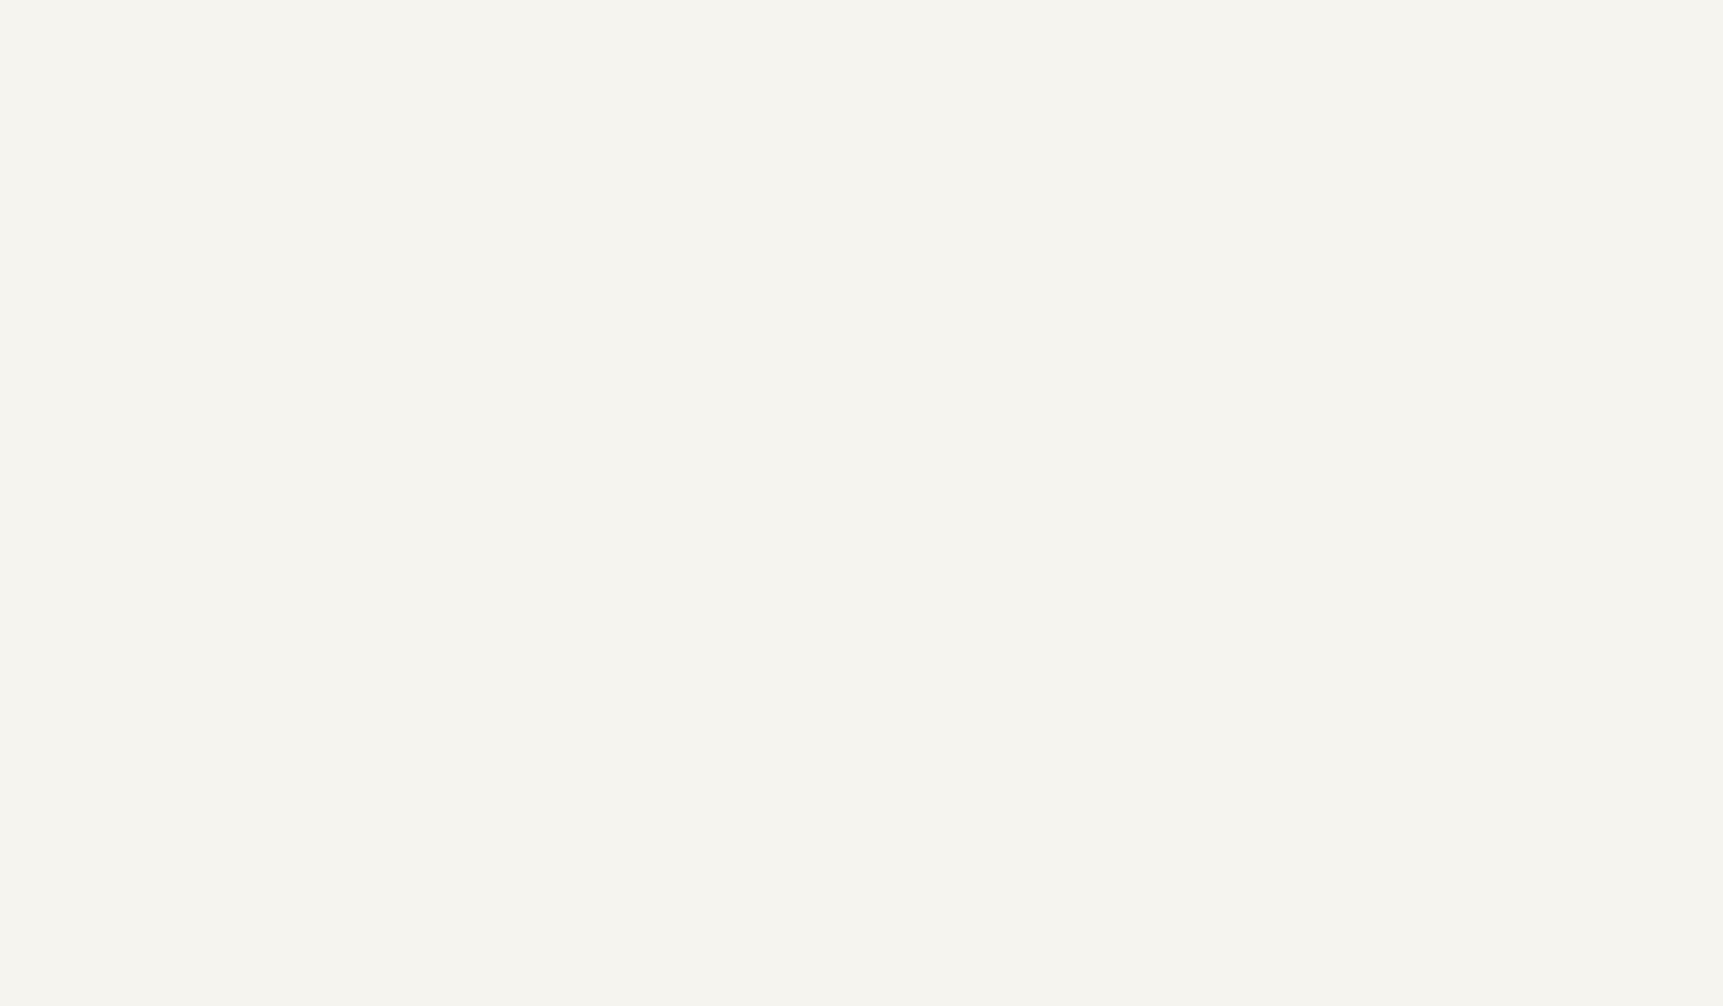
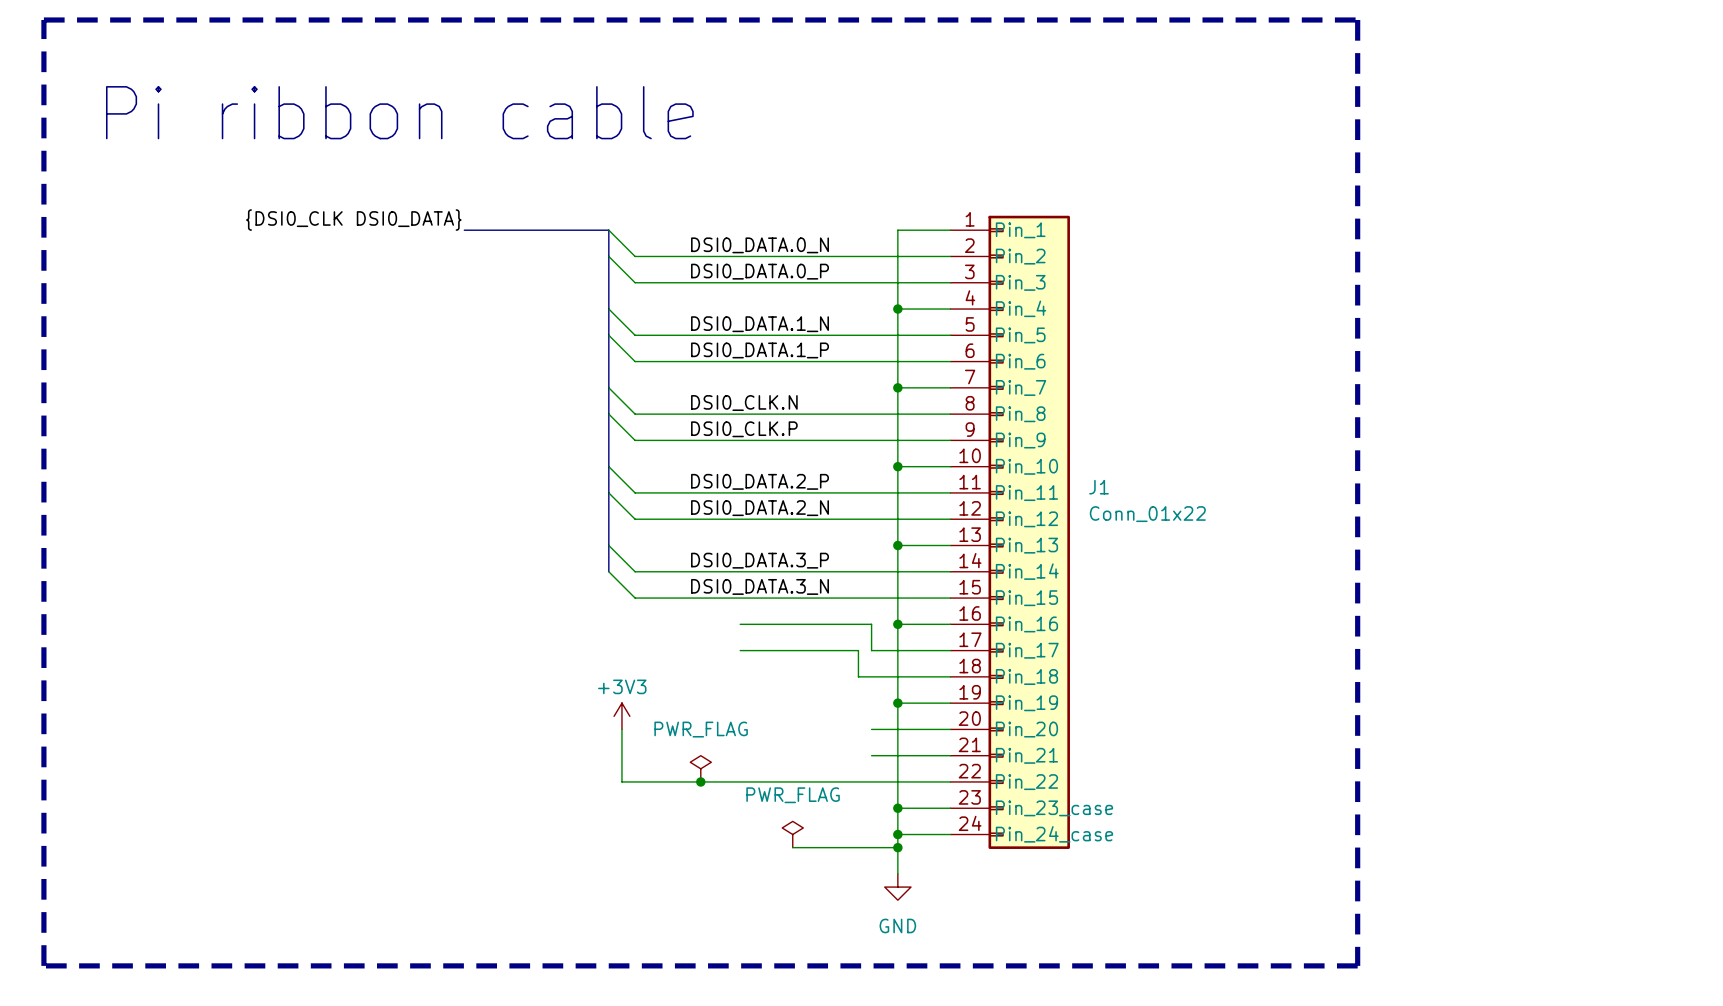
line: none -> (43, 20) (1357, 20) (1357, 965) (43, 965) (43, 20)
text: none -> Pi ribbon cable (399, 112)
label: none -> {DSI0_CLK DSI0_DATA} (353, 220)
bus: none -> (464, 230) (608, 230) (608, 571)
wire: none -> (608, 230) (635, 256) (950, 256)
wire: none -> (950, 230) (897, 230) (897, 873)
label: none -> DSI0_DATA.0_N (760, 245)
wire: none -> (608, 256) (635, 282) (950, 282)
label: none -> DSI0_DATA.0_P (760, 271)
wire: none -> (608, 309) (635, 335) (950, 335)
wire: none -> (897, 309) (950, 309)
junction: none -> (897, 309)
label: none -> DSI0_DATA.1_N (760, 324)
wire: none -> (608, 335) (635, 361) (950, 361)
label: none -> DSI0_DATA.1_P (760, 350)
wire: none -> (608, 387) (635, 414) (950, 414)
wire: none -> (897, 387) (950, 387)
junction: none -> (897, 387)
label: none -> DSI0_CLK.N (744, 403)
wire: none -> (608, 414) (635, 440) (950, 440)
label: none -> DSI0_CLK.P (744, 429)
wire: none -> (608, 466) (635, 492) (950, 492)
wire: none -> (897, 466) (950, 466)
junction: none -> (897, 466)
label: none -> DSI0_DATA.2_P (760, 481)
wire: none -> (608, 492) (635, 519) (950, 519)
label: none -> DSI0_DATA.2_N (760, 508)
J1: none -> Conn_01x22 (1010, 532)
wire: none -> (608, 545) (635, 571) (950, 571)
wire: none -> (897, 545) (950, 545)
junction: none -> (897, 545)
label: none -> DSI0_DATA.3_P (760, 560)
wire: none -> (608, 571) (635, 598) (950, 598)
label: none -> DSI0_DATA.3_N (760, 586)
wire: none -> (740, 624) (871, 624) (871, 650) (950, 650)
wire: none -> (897, 624) (950, 624)
junction: none -> (897, 624)
wire: none -> (740, 650) (858, 650) (858, 676) (950, 676)
wire: none -> (897, 703) (950, 703)
junction: none -> (897, 703)
power symbol: none -> +3V3 (621, 716)
wire: none -> (621, 729) (621, 781) (950, 781)
wire: none -> (871, 729) (950, 729)
wire: none -> (871, 755) (950, 755)
power symbol: none -> PWR_FLAG (700, 768)
junction: none -> (700, 781)
wire: none -> (897, 808) (950, 808)
junction: none -> (897, 808)
power symbol: none -> PWR_FLAG (792, 834)
wire: none -> (897, 834) (950, 834)
junction: none -> (897, 834)
wire: none -> (792, 847) (897, 847)
junction: none -> (897, 847)
power symbol: none -> GND (897, 887)

